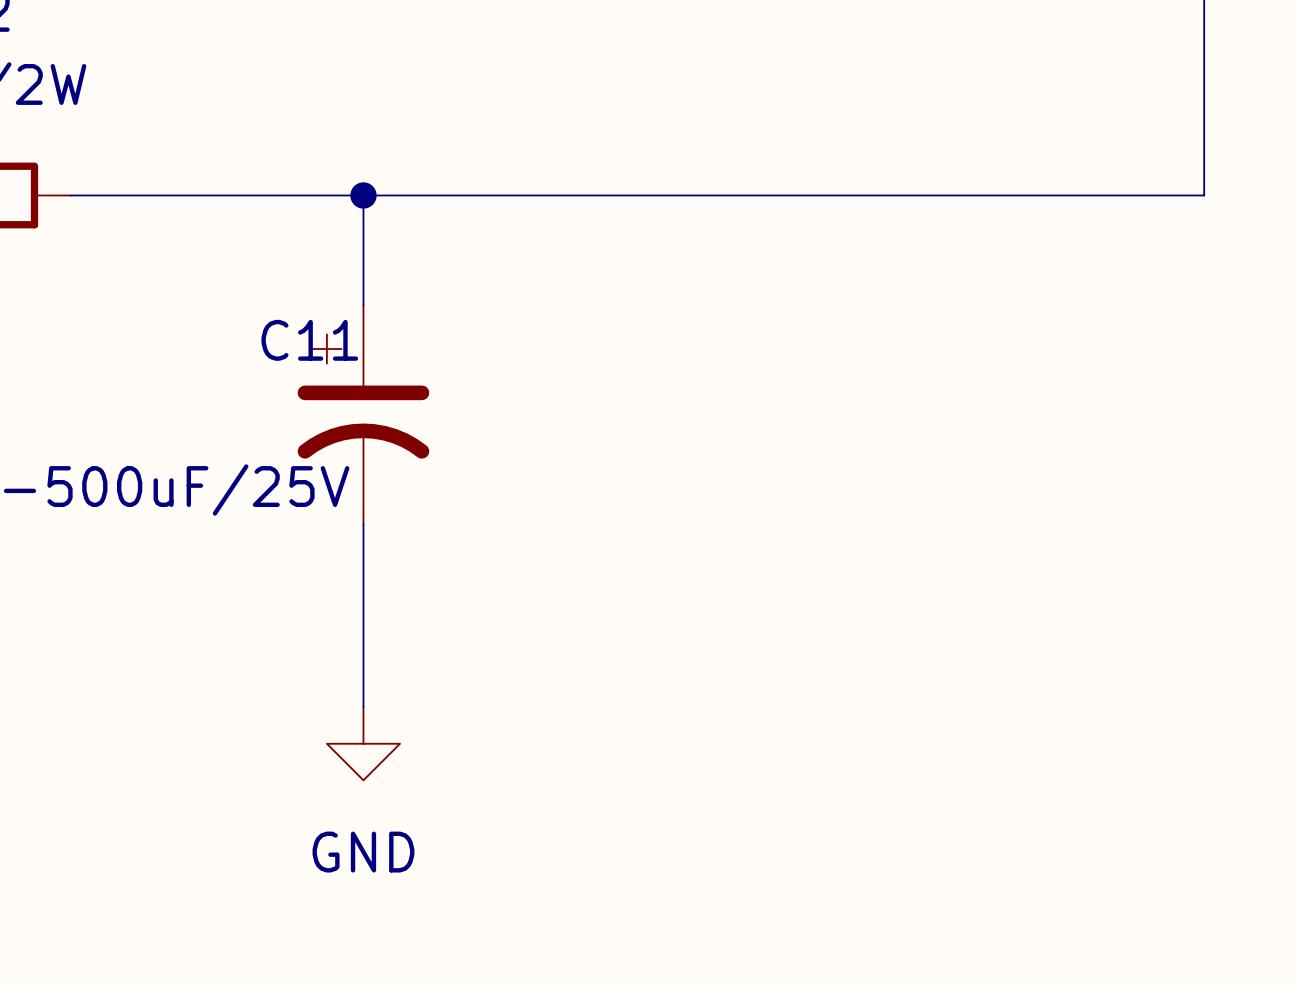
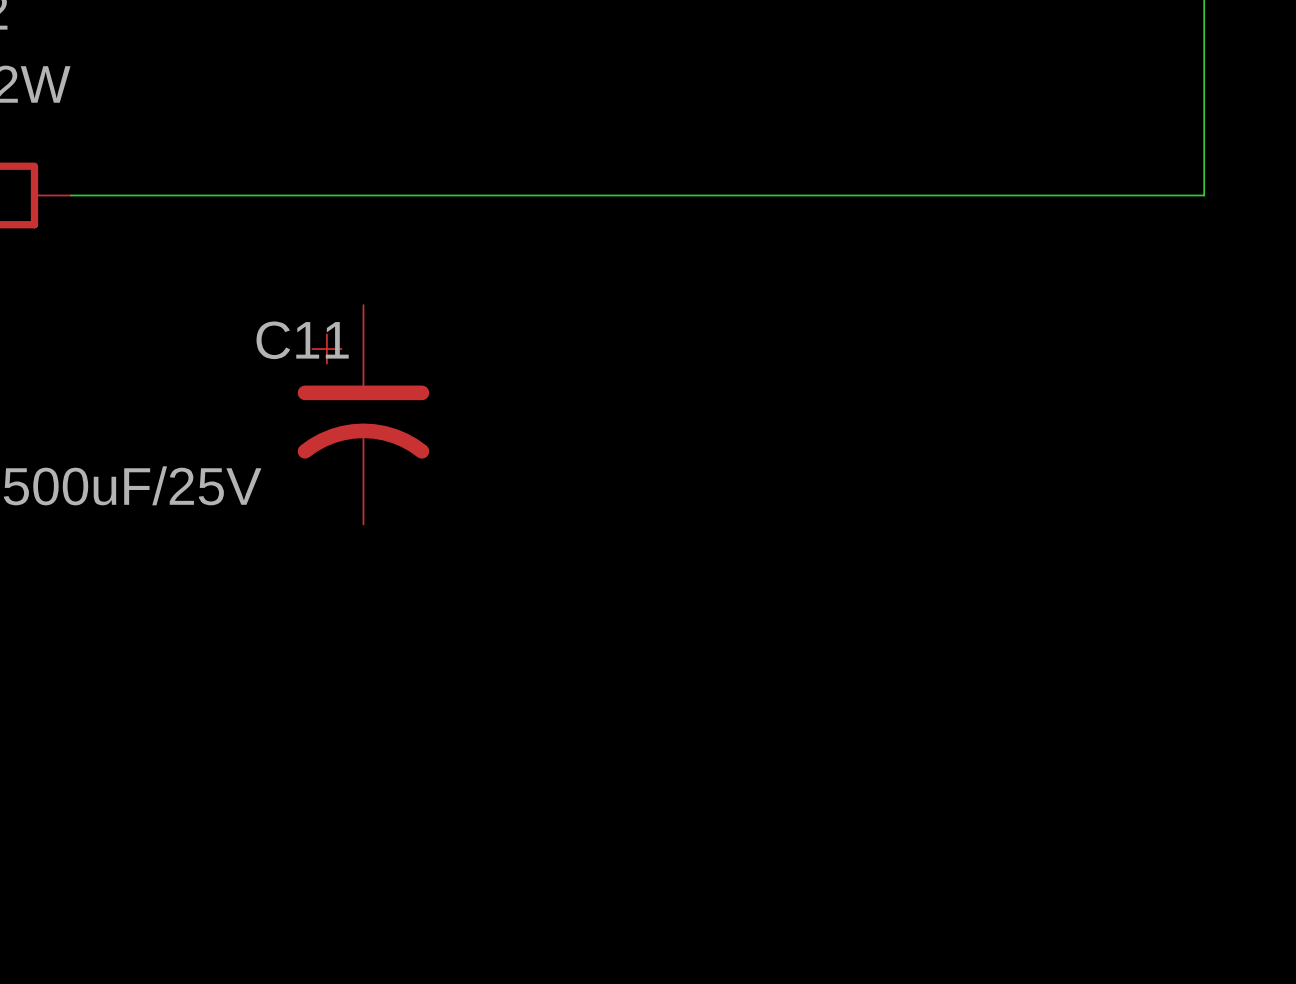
wire: (363, 195) (363, 305) -> none
junction: (363, 195) -> none
wire: (363, 524) (363, 707) -> none
power symbol: GND (363, 743) -> none

